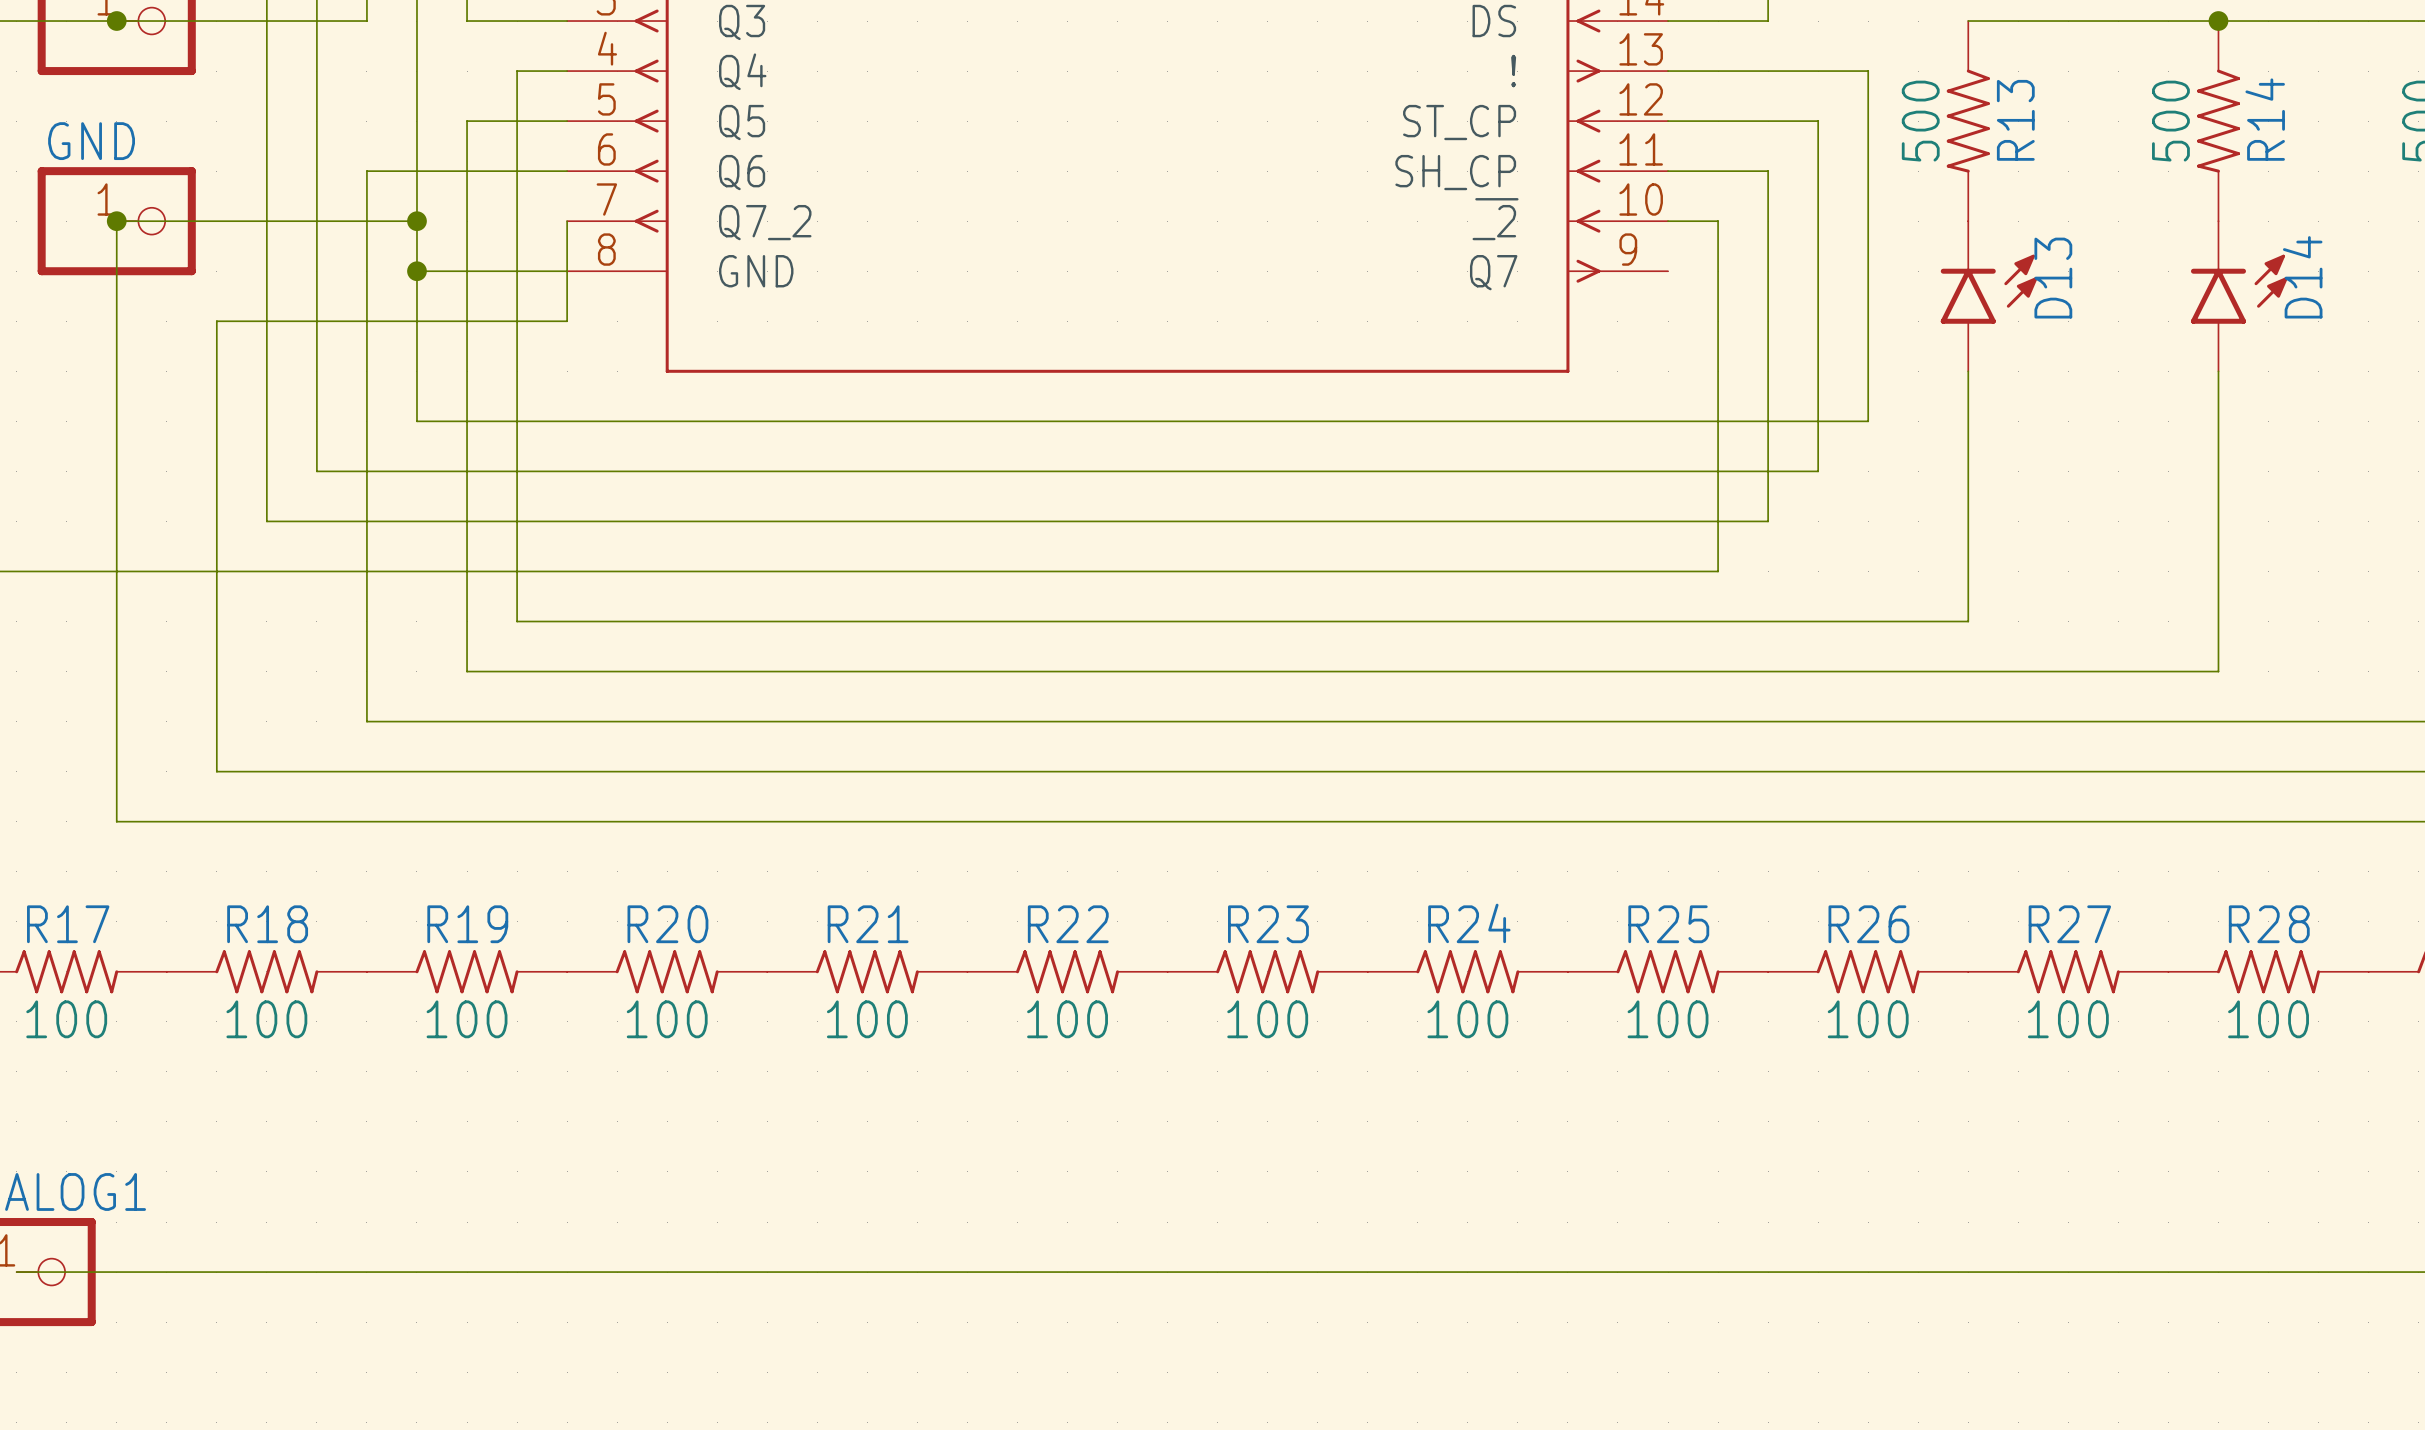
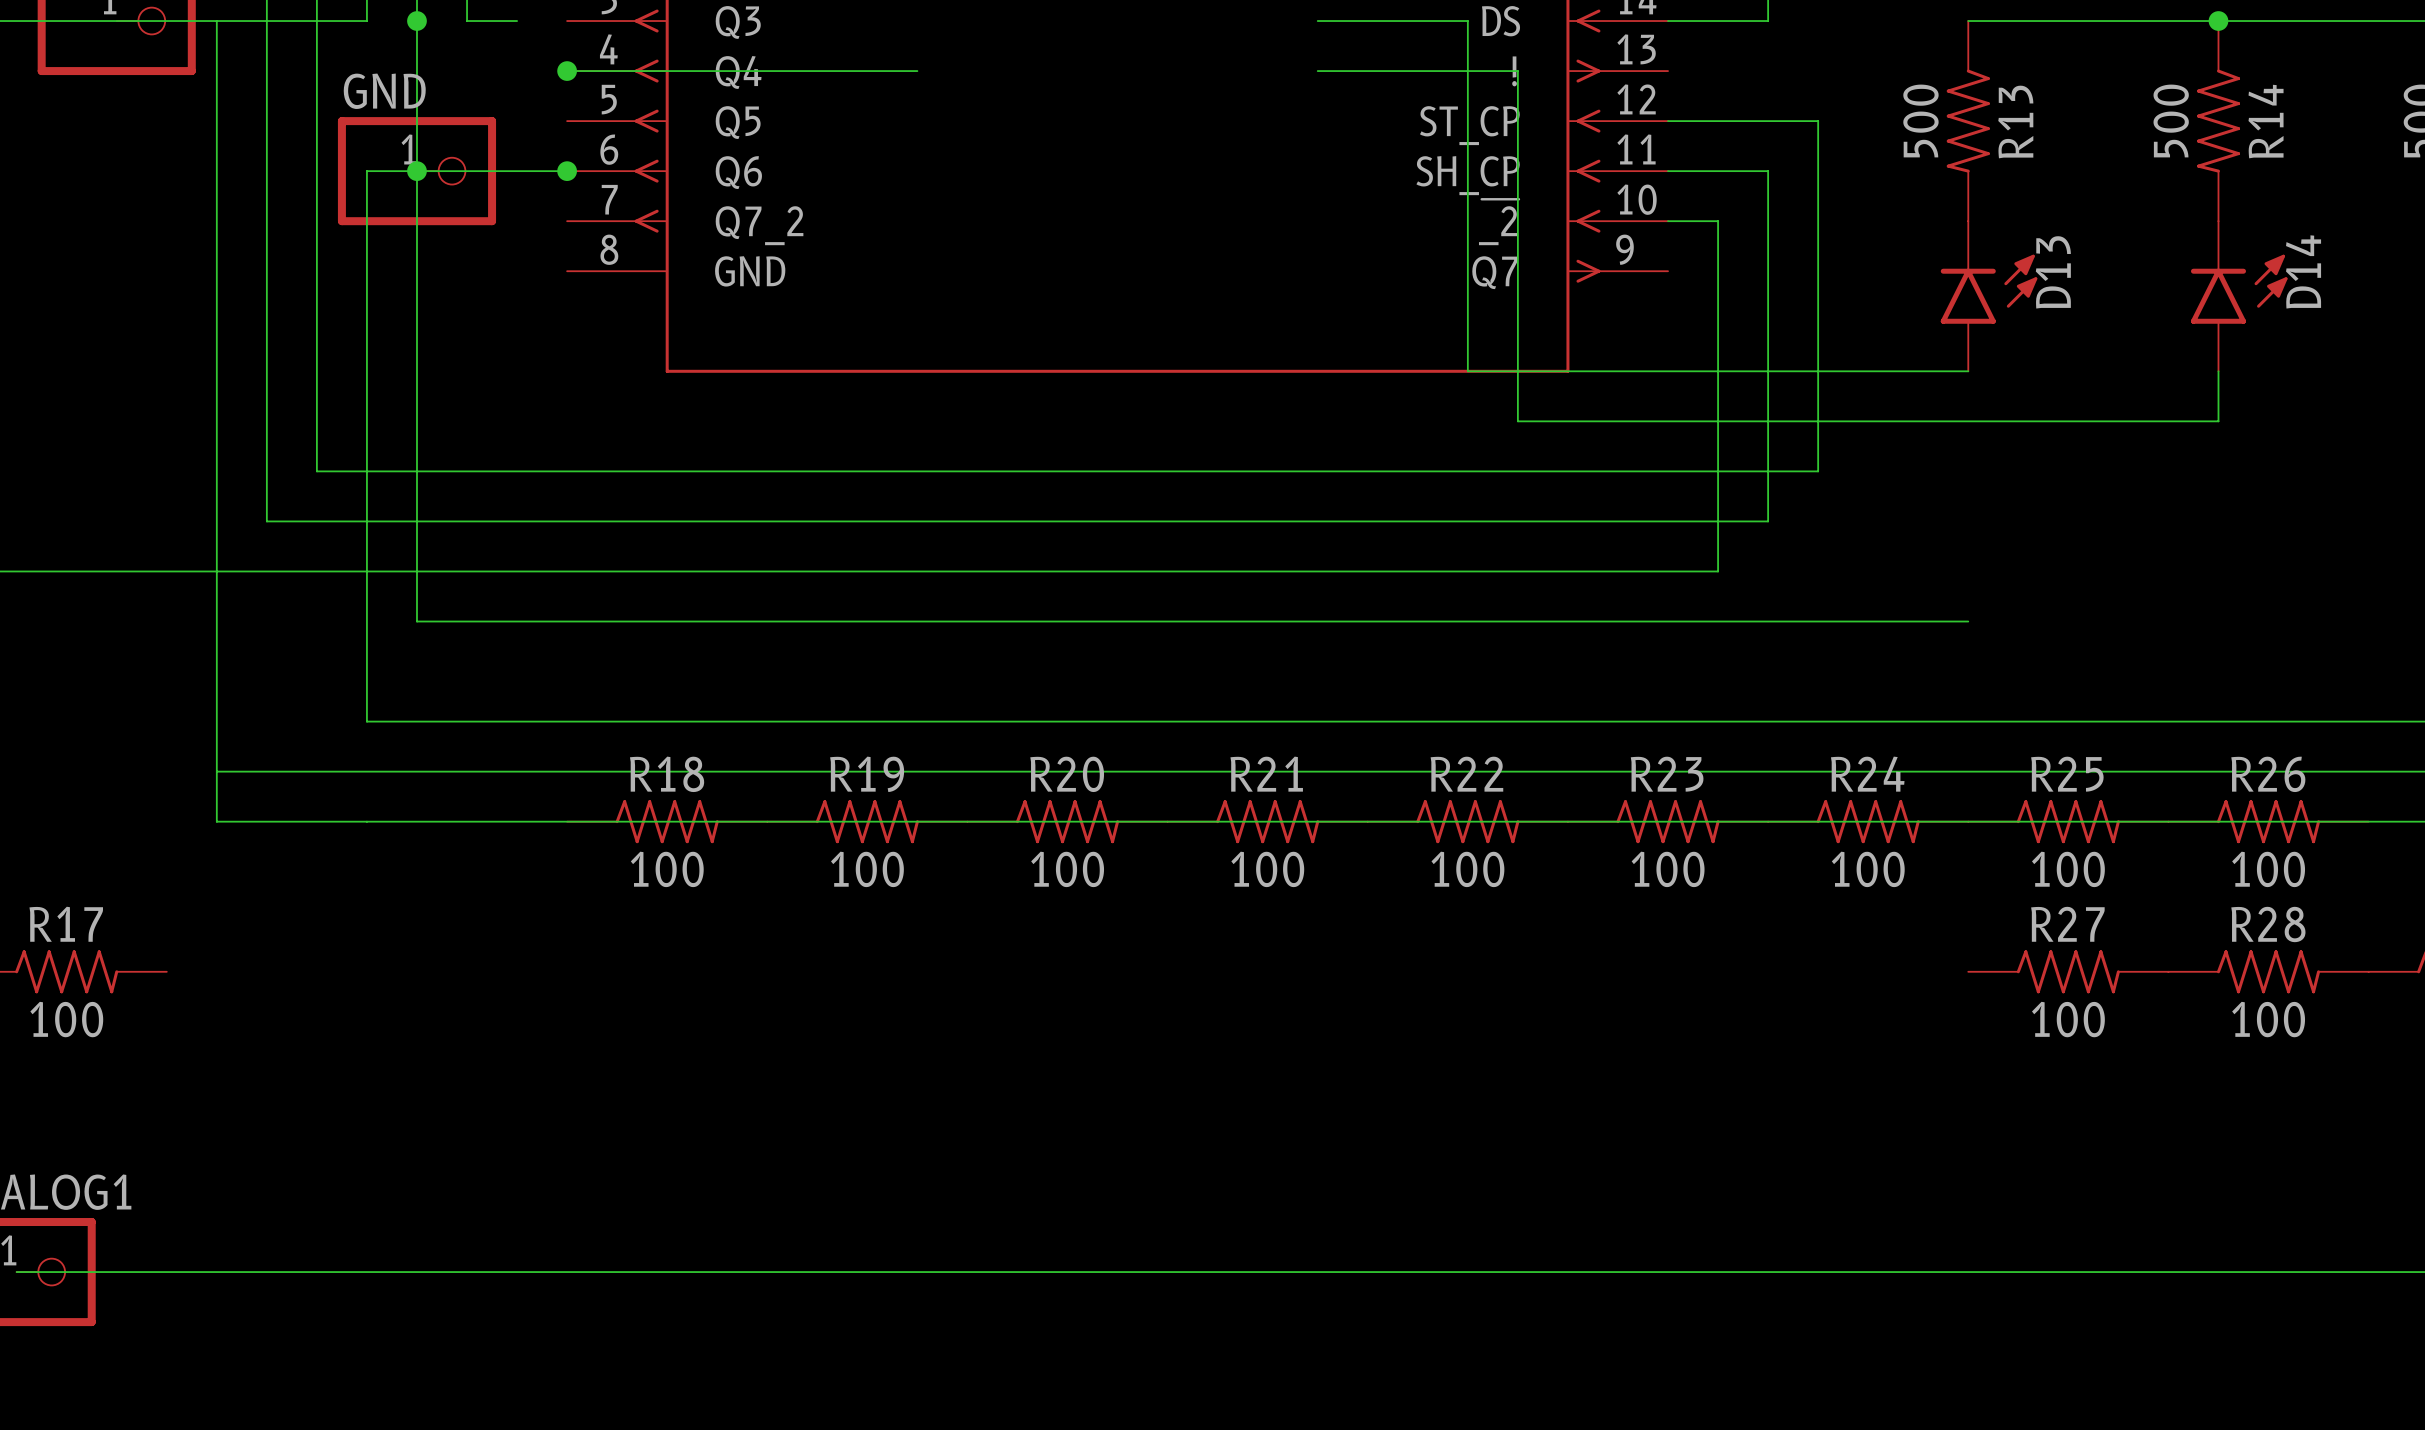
junction: (116, 21) -> none
junction: none -> (416, 21)
wire: (517, 21) (567, 21) -> none
wire: (567, 71) (517, 71) (517, 621) -> (416, 421) (416, 621) (517, 621)
wire: none -> (567, 71) (917, 71)
junction: none -> (567, 71)
wire: (1668, 71) (1868, 71) (1868, 421) -> (2218, 421) (1868, 421)
wire: (567, 121) (467, 121) (467, 671) (2218, 671) (2218, 421) -> none
junction: none -> (416, 171)
junction: none -> (567, 171)
GND position: (116, 221) -> (416, 171)
junction: (116, 221) -> none
wire: (416, 221) (116, 221) (116, 821) (216, 821) -> (216, 771) (216, 821)
junction: (416, 221) -> none
wire: (567, 221) (567, 321) (216, 321) -> (216, 21) (216, 321)
wire: (416, 271) (567, 271) -> none
junction: (416, 271) -> none
wire: (1968, 371) (1968, 621) -> (1968, 371) (1467, 371) (1467, 21) (1317, 21)
wire: (416, 421) (1517, 421) -> (1317, 71) (1517, 71) (1517, 421)
R18 position: (266, 971) -> (667, 821)
R19 position: (467, 971) -> (867, 821)
R20 position: (667, 971) -> (1067, 821)
R21 position: (867, 971) -> (1267, 821)
R22 position: (1067, 971) -> (1467, 821)
R23 position: (1267, 971) -> (1668, 821)
R24 position: (1467, 971) -> (1868, 821)
R25 position: (1668, 971) -> (2068, 821)
R26 position: (1868, 971) -> (2268, 821)

